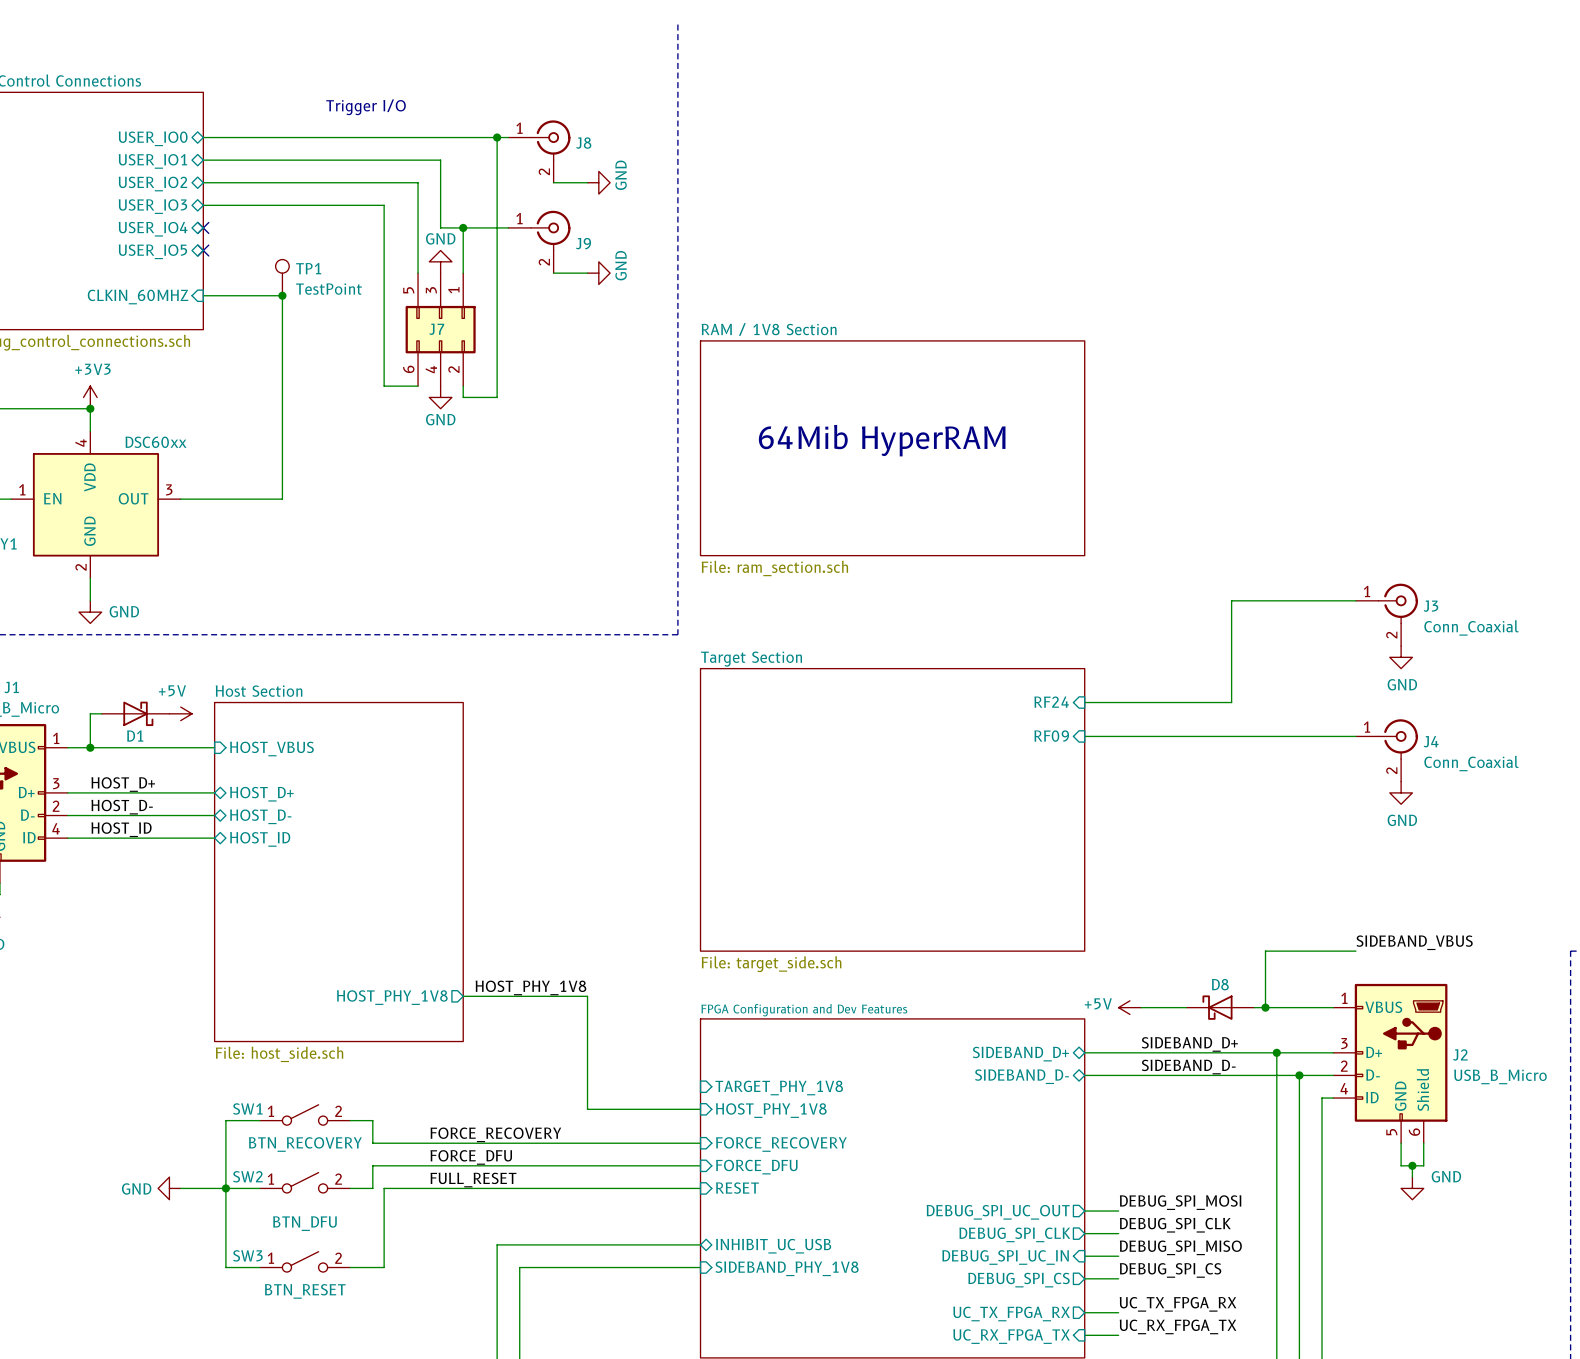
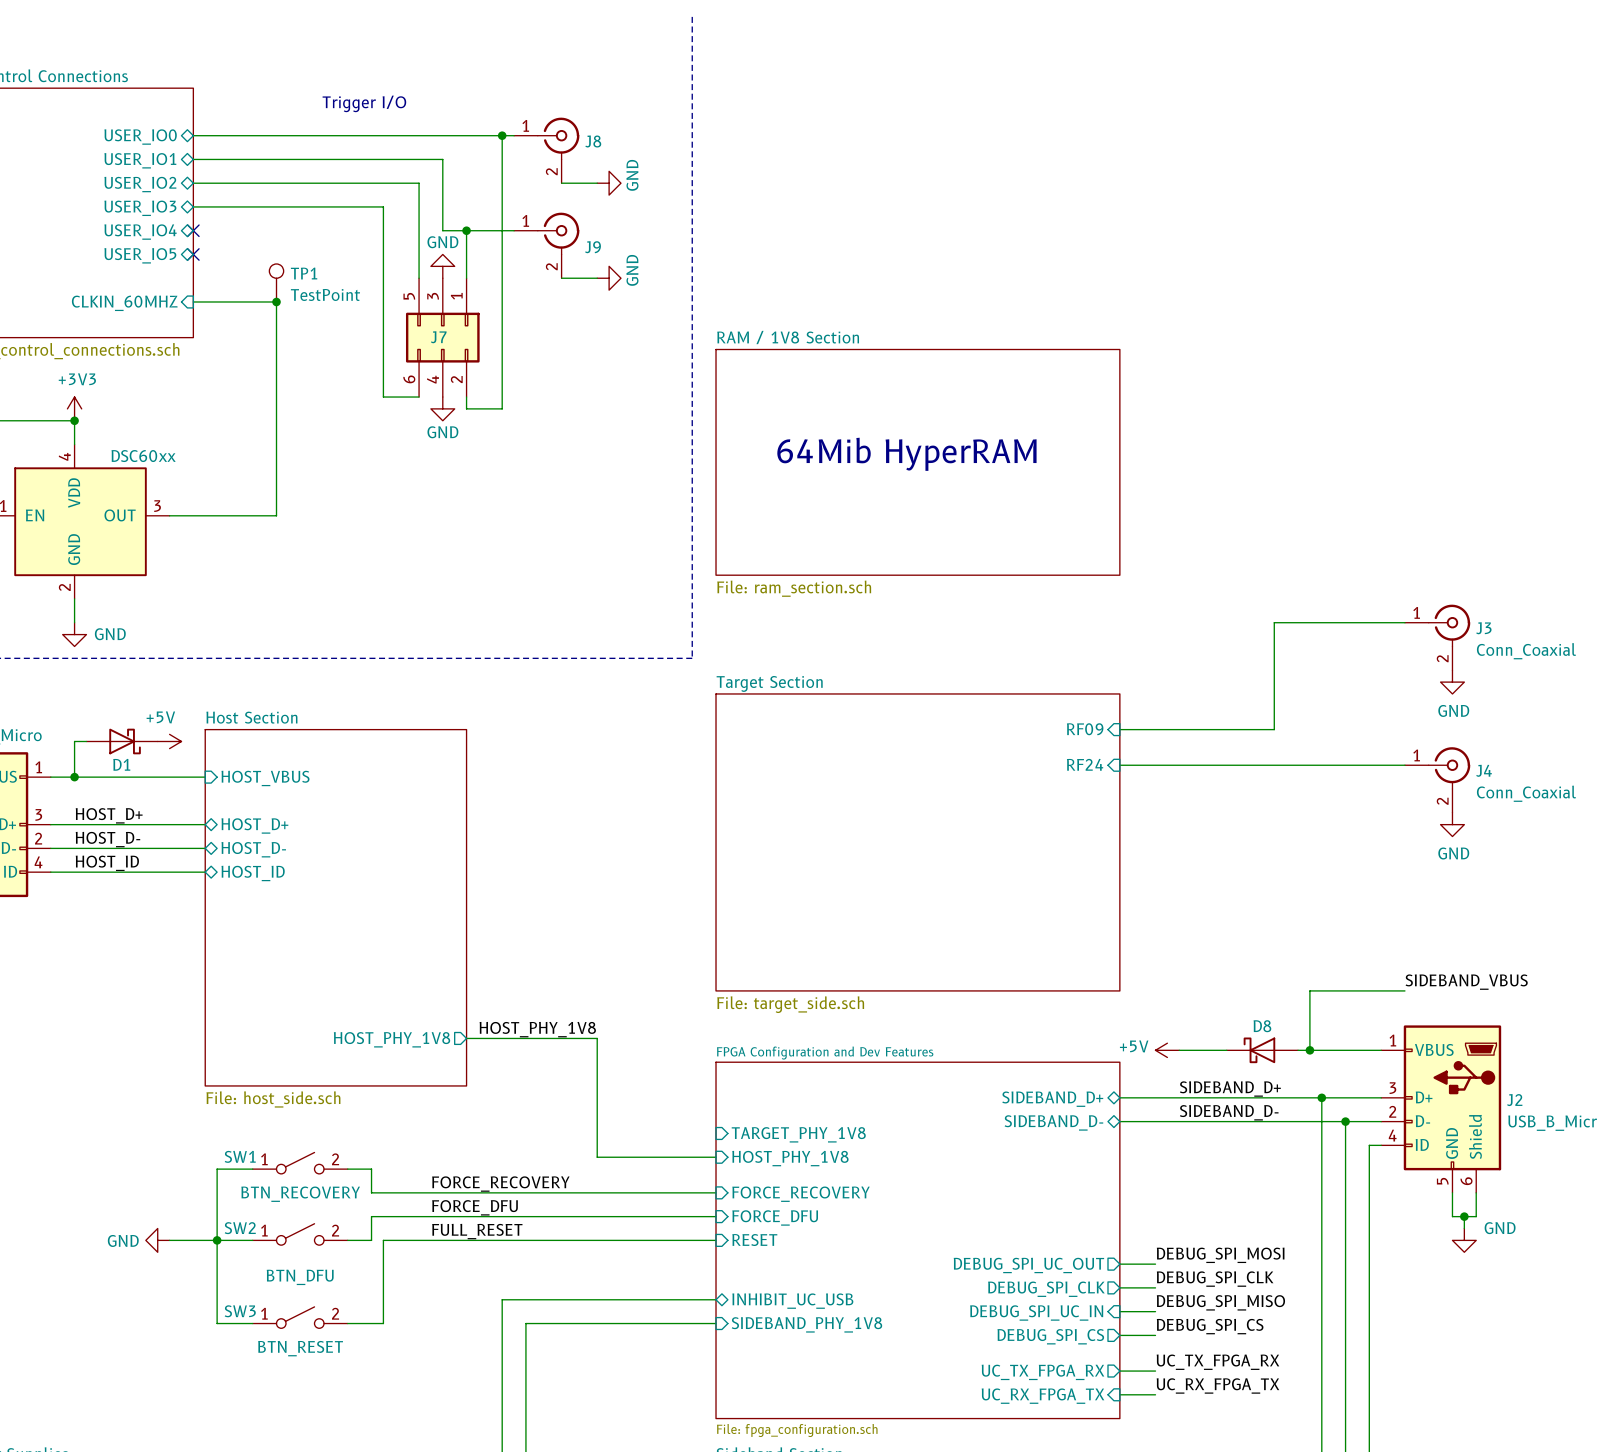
sheet pin: RF24 (1051, 702) -> RF09 (1085, 729)
sheet pin: RF09 (1051, 736) -> RF24 (1085, 764)

